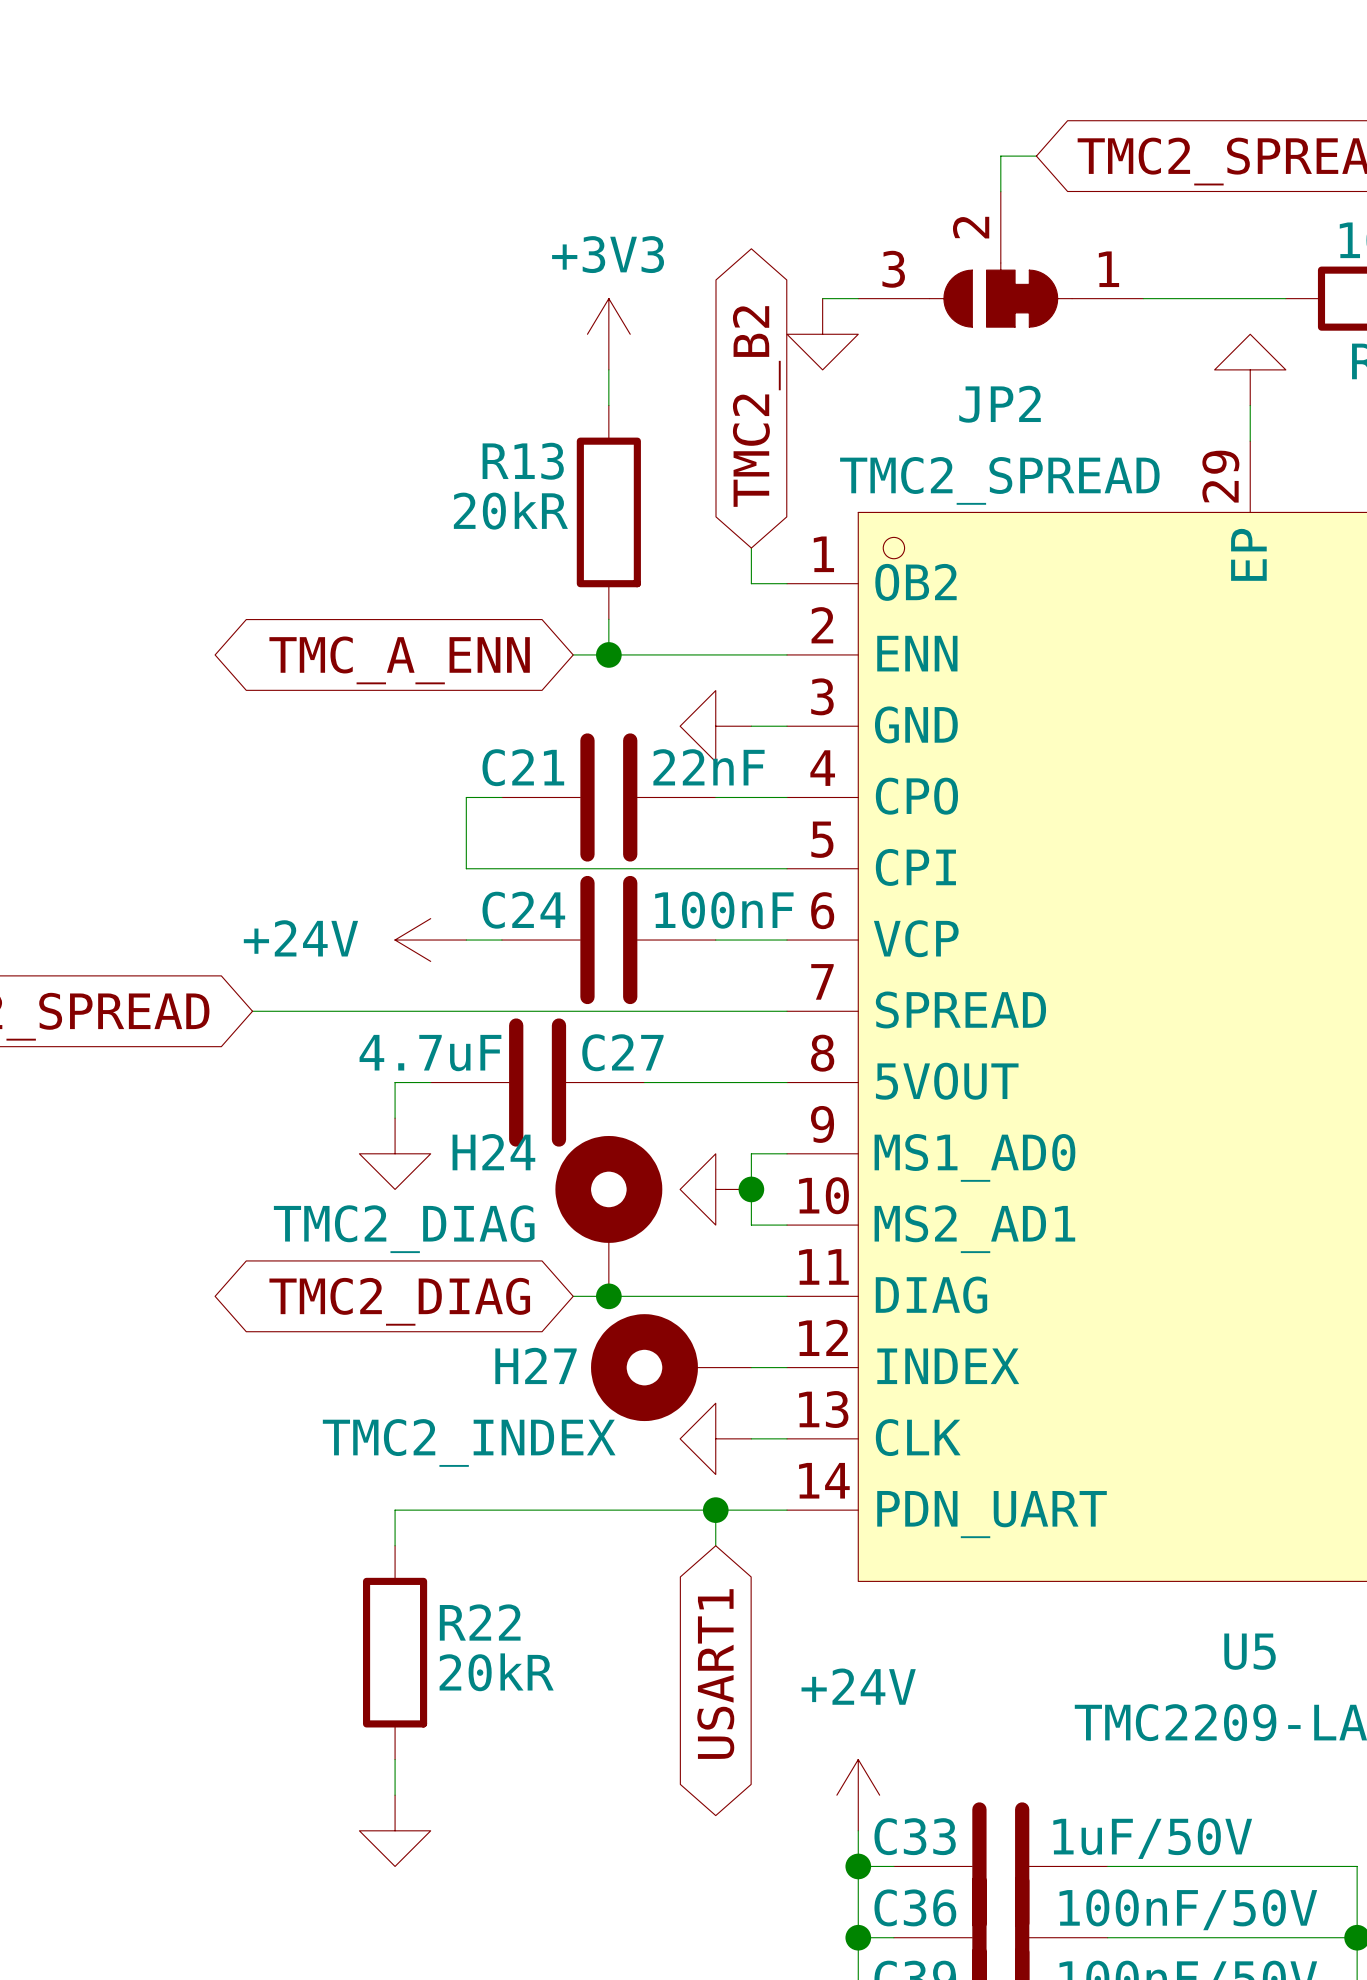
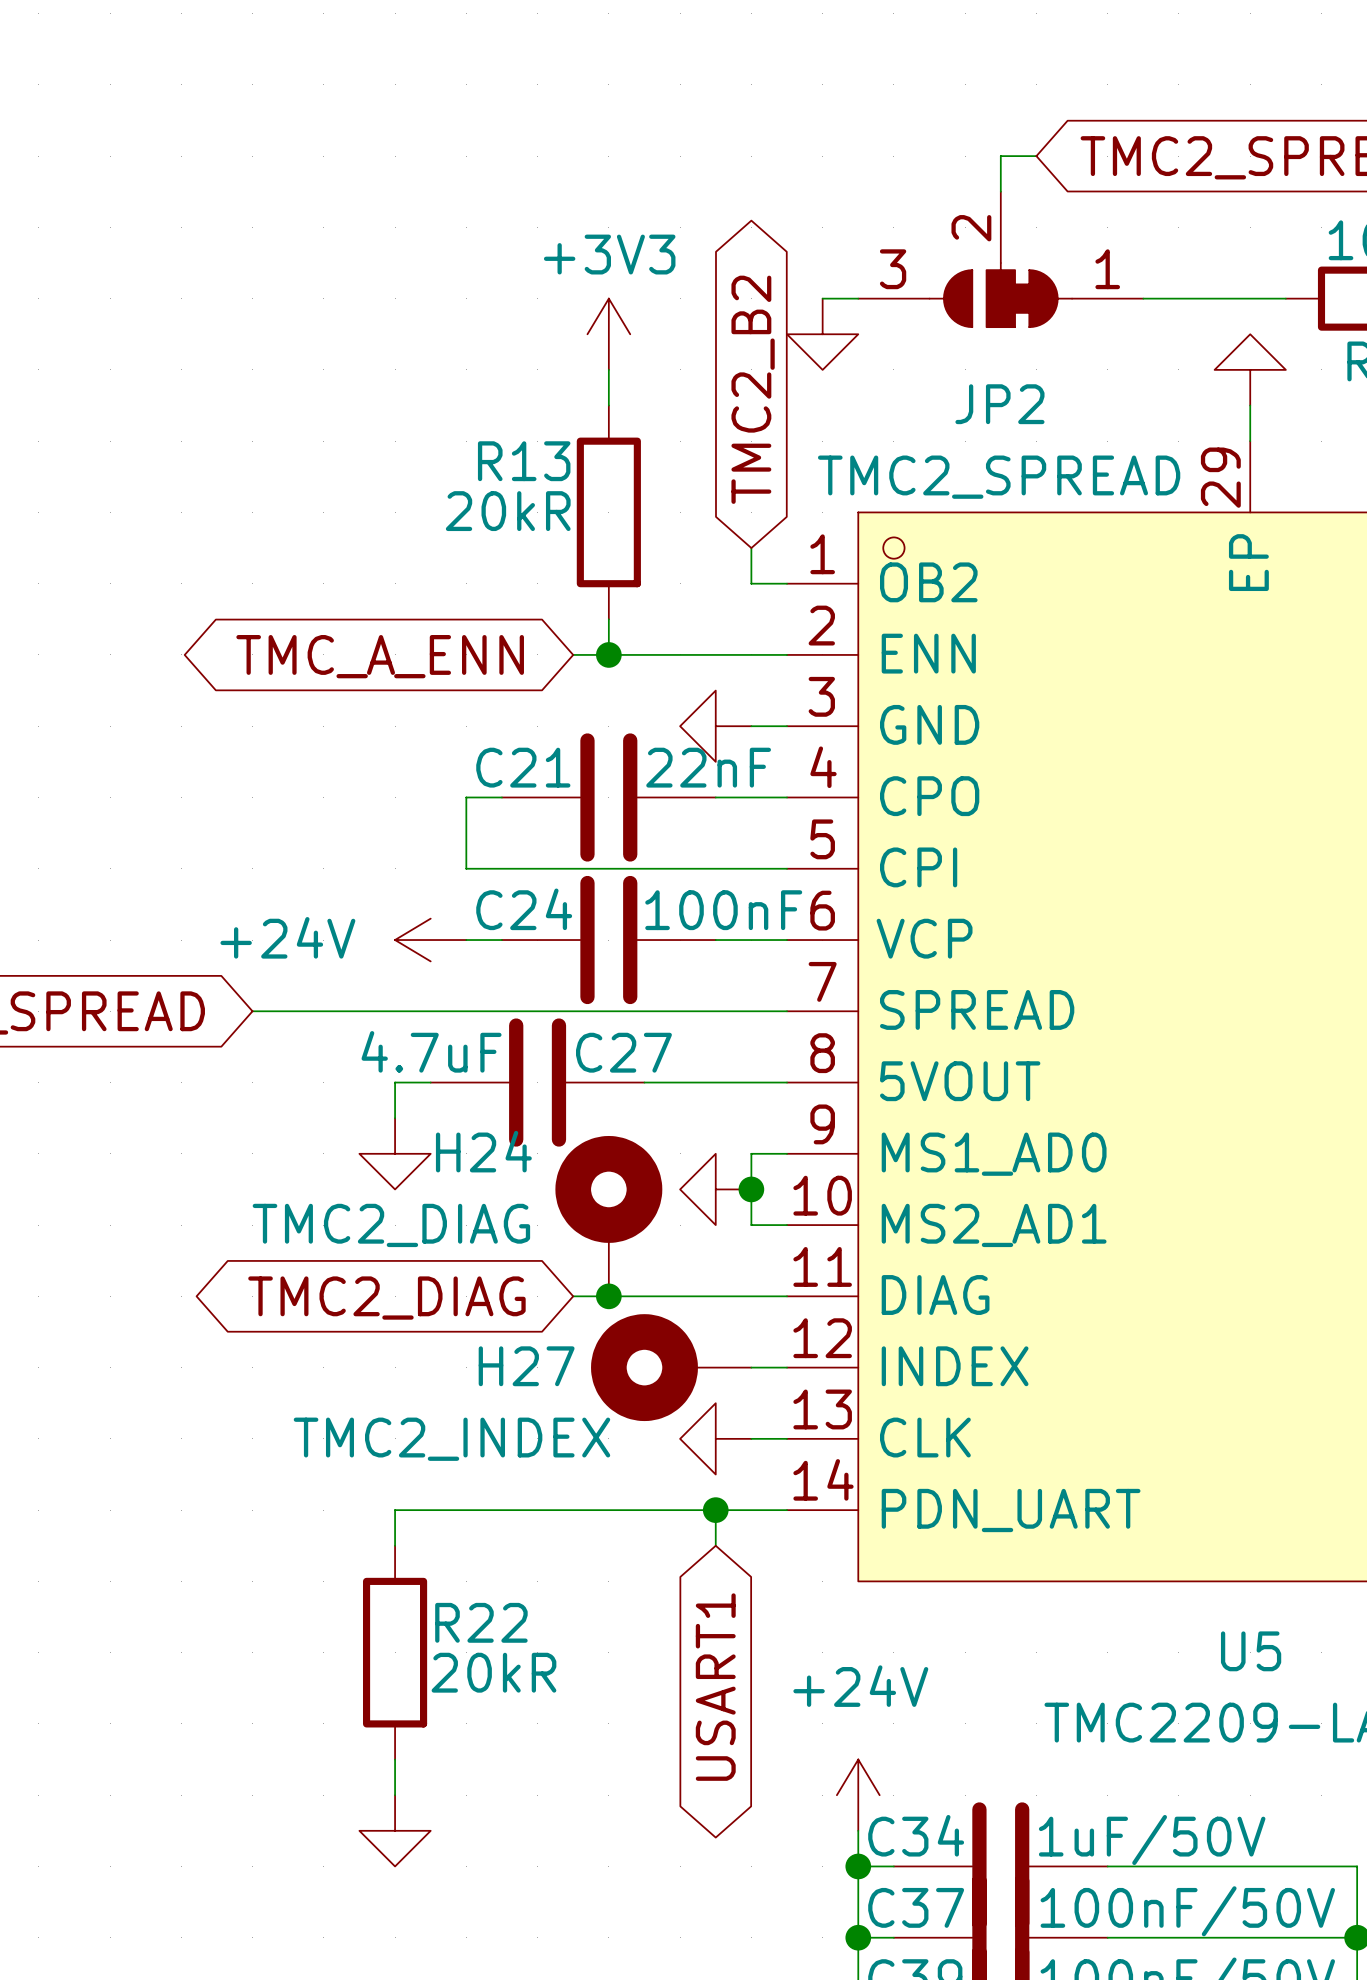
C33 name: C33 (915, 1836) -> C34 (916, 1835)
C36 name: C36 (915, 1907) -> C37 (916, 1907)

